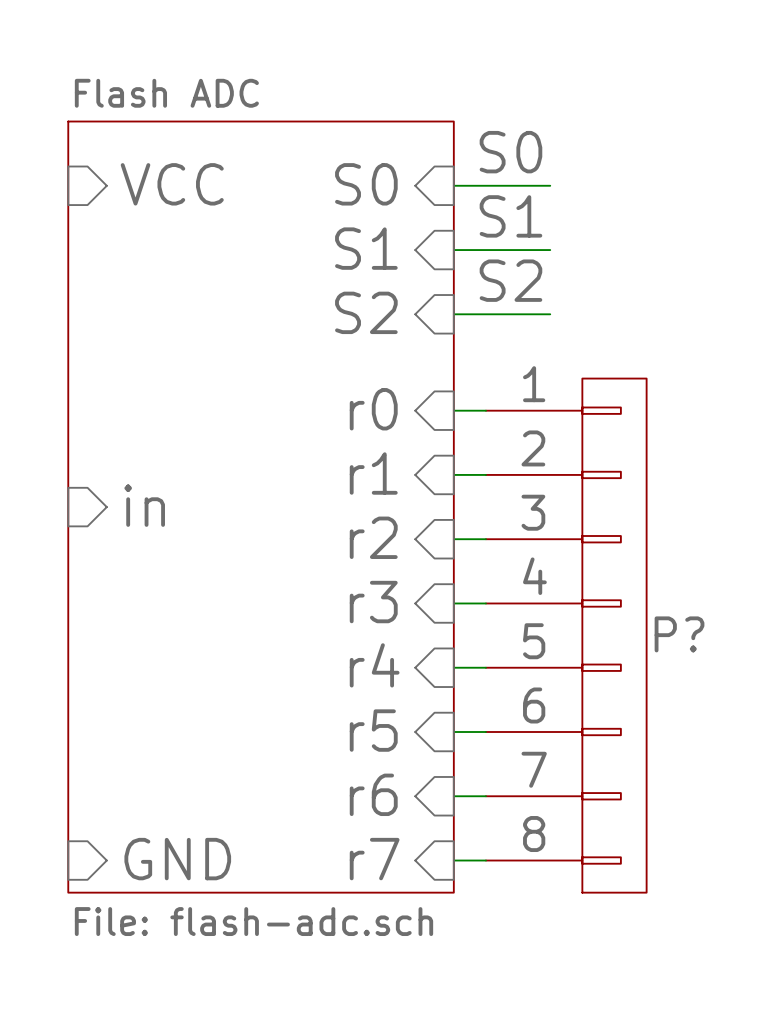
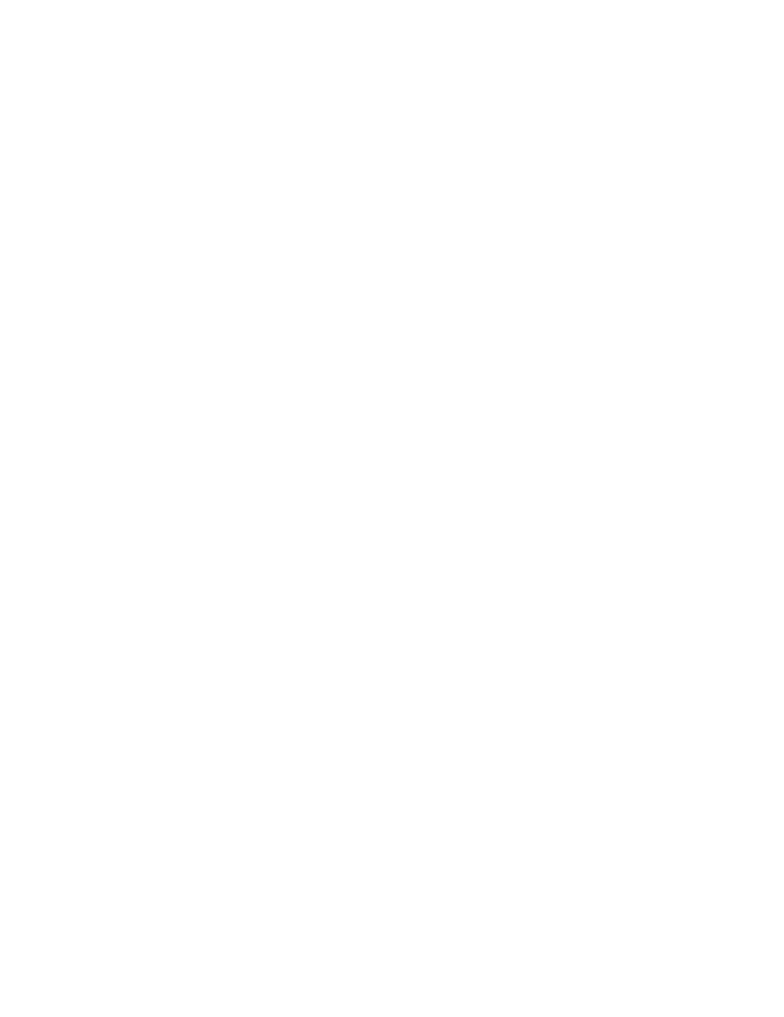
label: S0 (510, 152) -> none
sheet pin: VCC (172, 184) -> none
sheet pin: S0 (366, 184) -> none
wire: (453, 185) (550, 185) -> none
label: S1 (510, 216) -> none
sheet pin: S1 (366, 248) -> none
wire: (453, 250) (550, 250) -> none
label: S2 (510, 280) -> none
sheet pin: S2 (366, 312) -> none
wire: (453, 314) (550, 314) -> none
sheet pin: r0 (373, 409) -> none
wire: (453, 410) (485, 410) -> none
sheet pin: r1 (373, 473) -> none
wire: (453, 474) (485, 474) -> none
sheet pin: in (144, 505) -> none
sheet Flash ADC: File: flash-adc.sch (261, 507) -> none
sheet pin: r2 (373, 537) -> none
wire: (453, 539) (485, 539) -> none
sheet pin: r3 (373, 602) -> none
wire: (453, 603) (485, 603) -> none
P?: (566, 635) -> none
sheet pin: r4 (374, 665) -> none
wire: (453, 667) (485, 667) -> none
sheet pin: r5 (373, 730) -> none
wire: (453, 732) (485, 732) -> none
sheet pin: r6 (373, 794) -> none
wire: (453, 796) (485, 796) -> none
sheet pin: GND (177, 859) -> none
sheet pin: r7 (374, 859) -> none
wire: (453, 860) (485, 860) -> none

